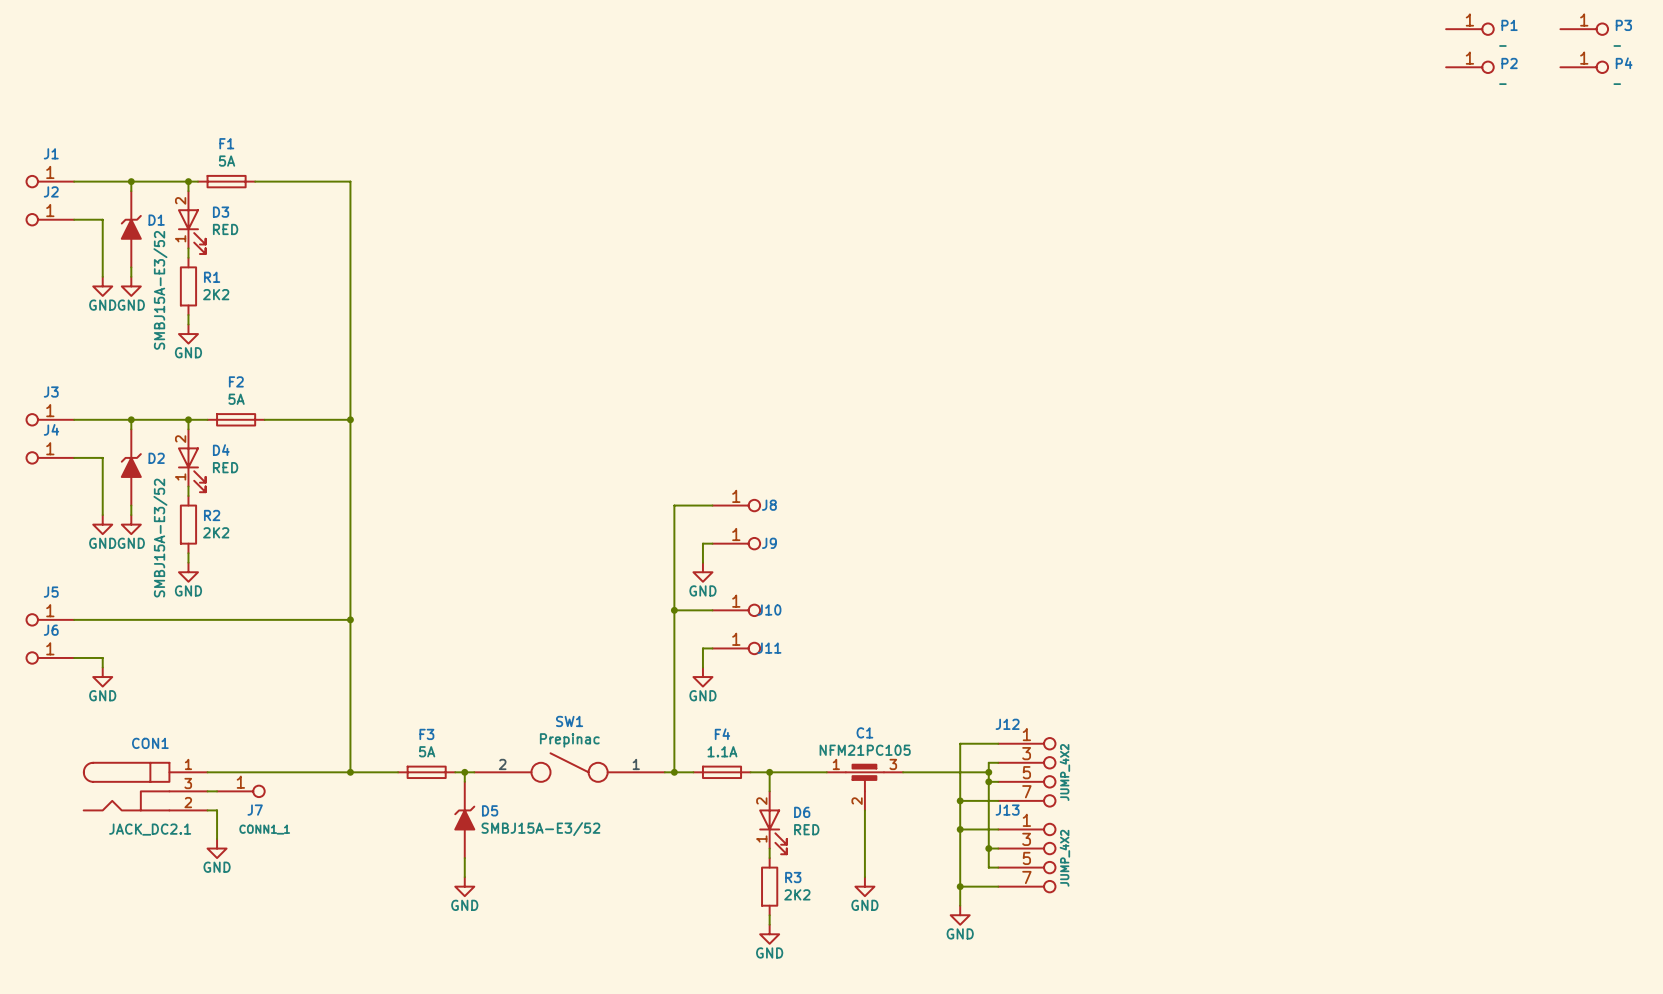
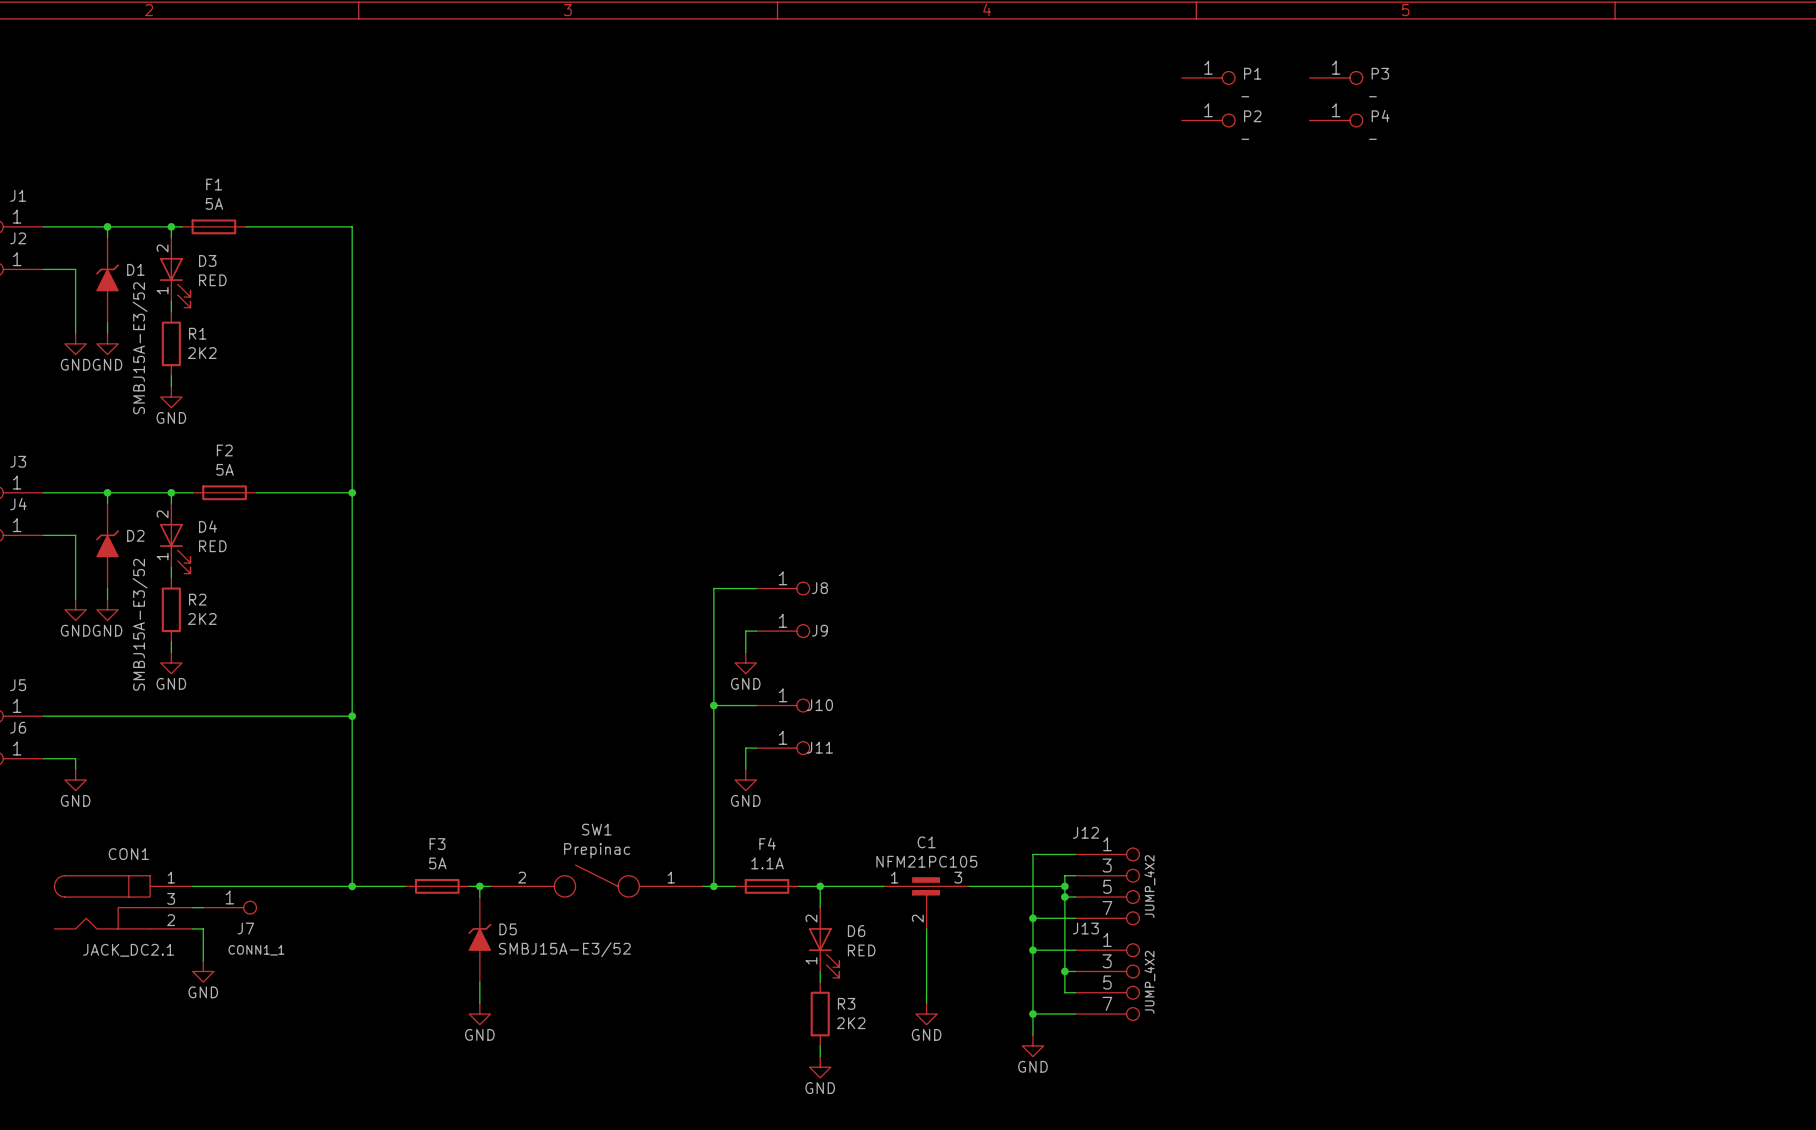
P1 position: (1469, 29) -> (1208, 77)
P3 position: (1584, 29) -> (1336, 77)
P2 position: (1469, 67) -> (1208, 120)
P4 position: (1584, 67) -> (1336, 120)

